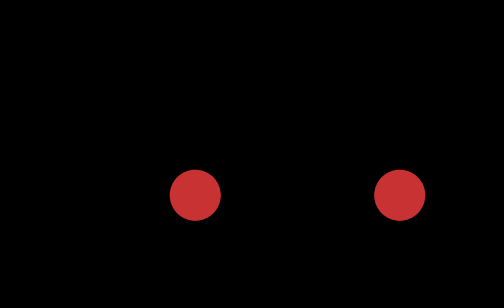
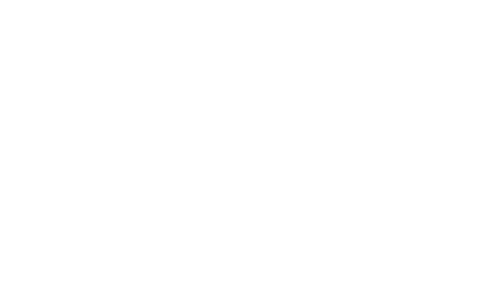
part: (195, 195) -> none
part: (399, 195) -> none

